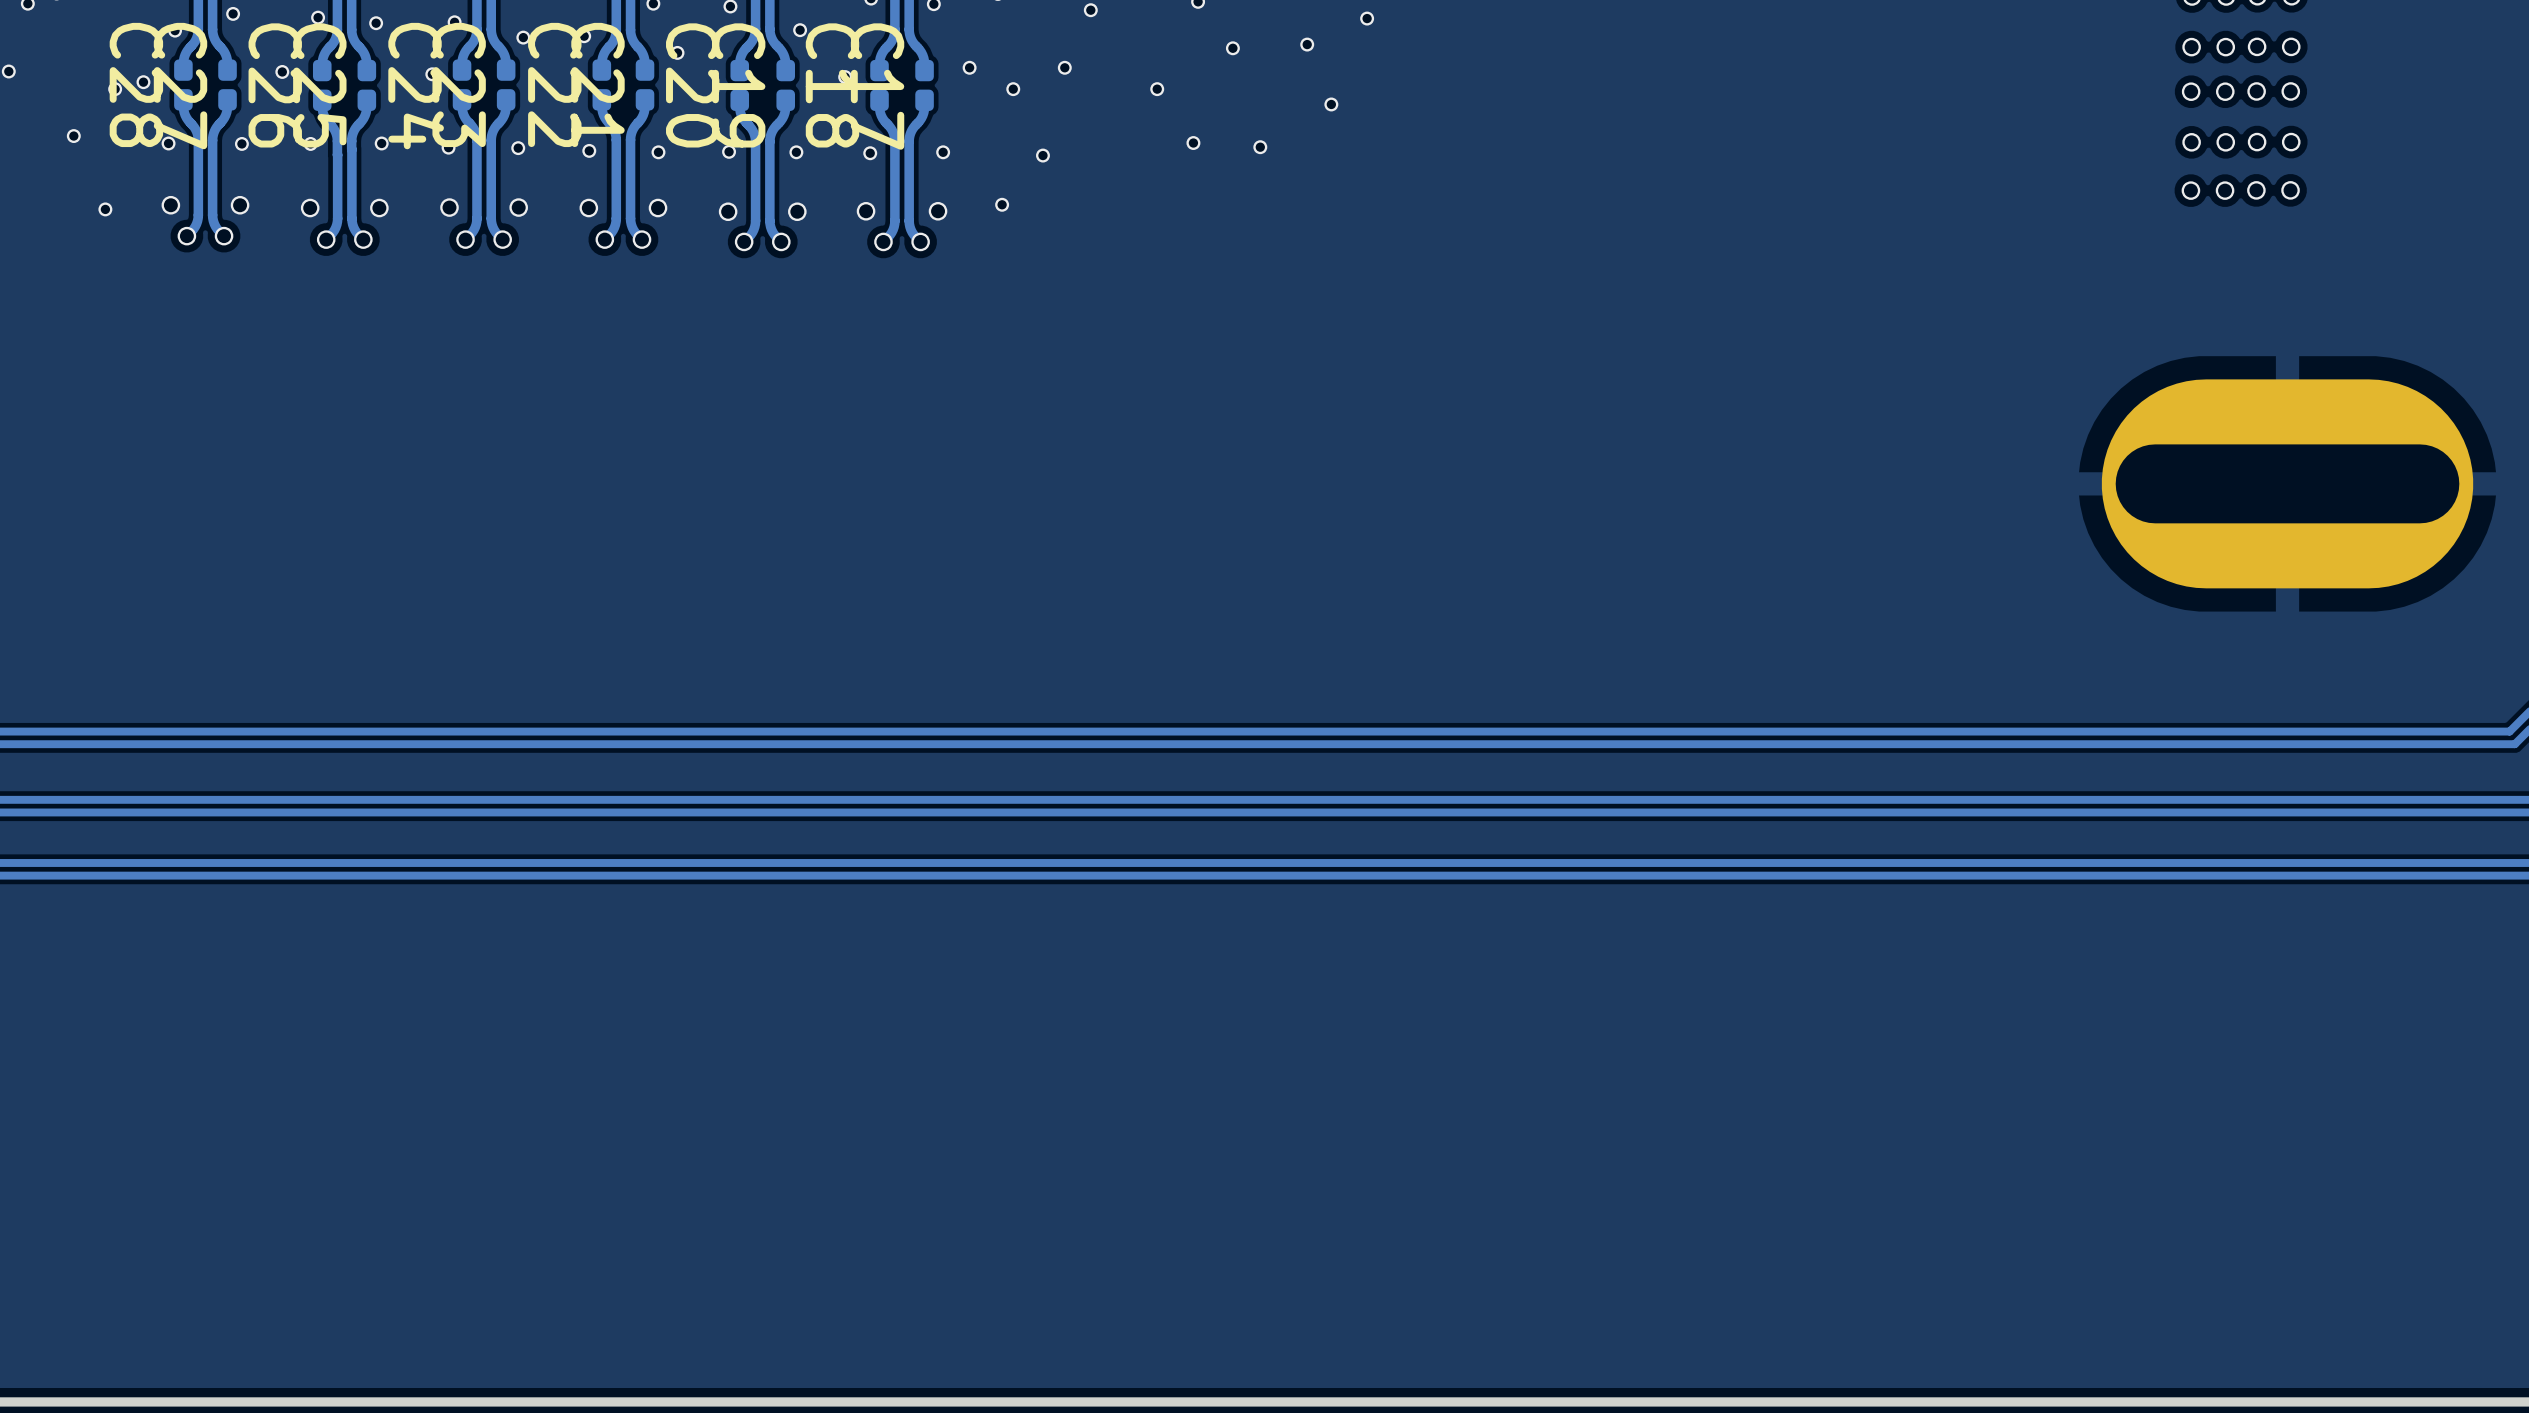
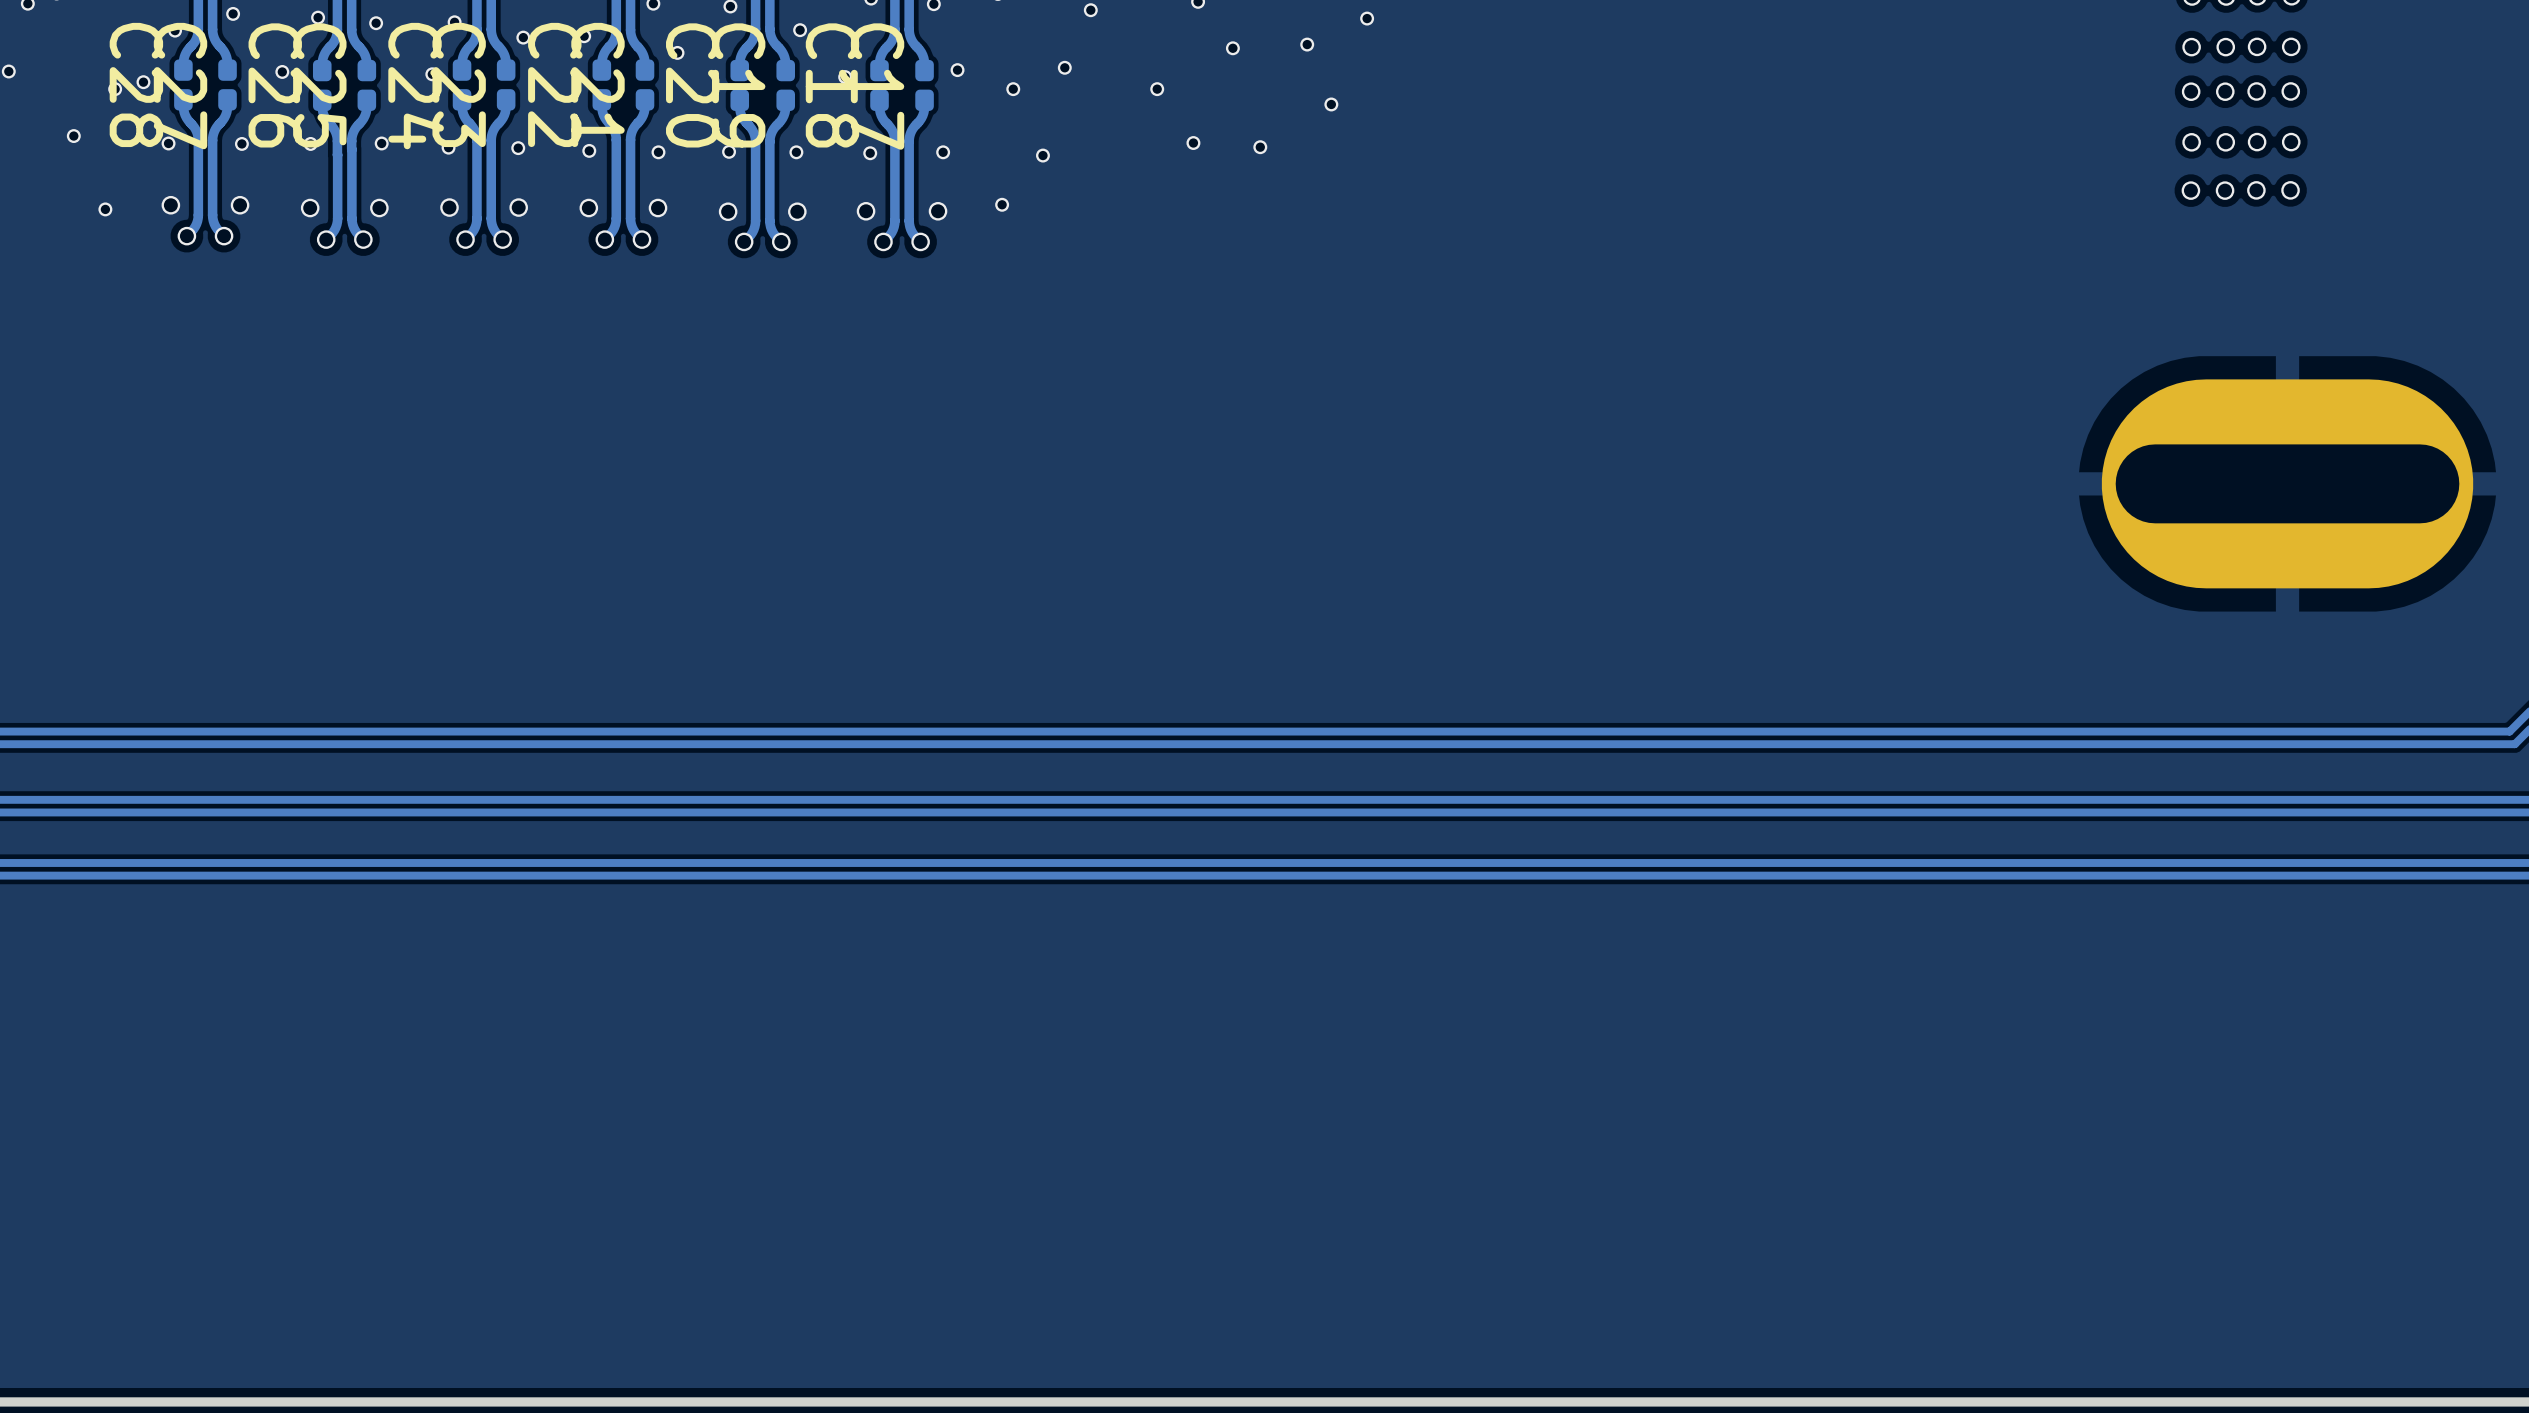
via position: (969, 67) -> (957, 70)

